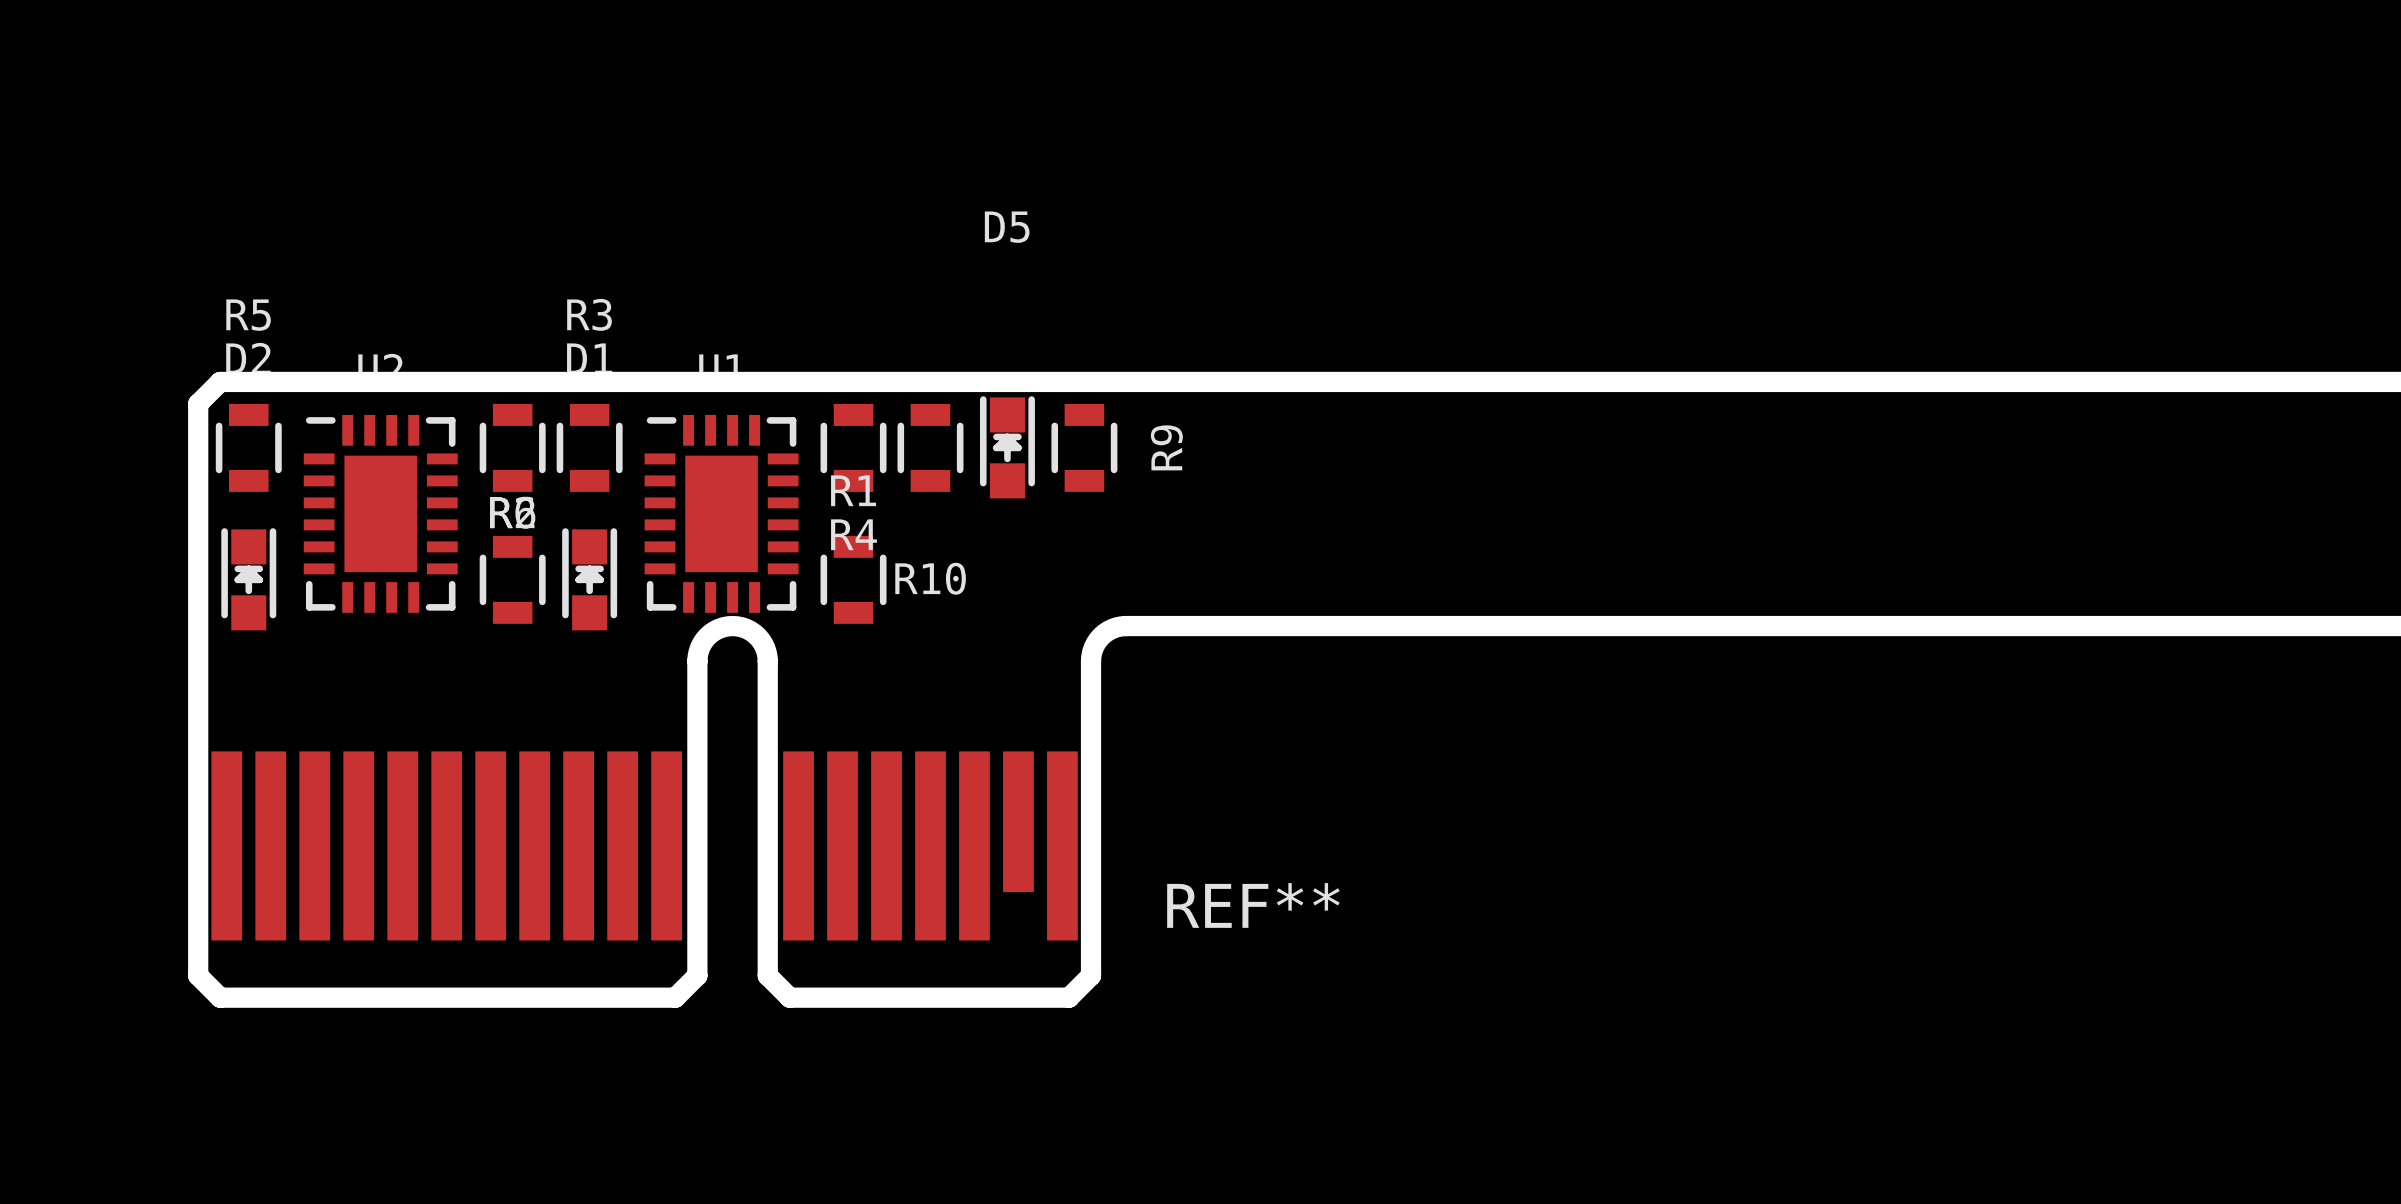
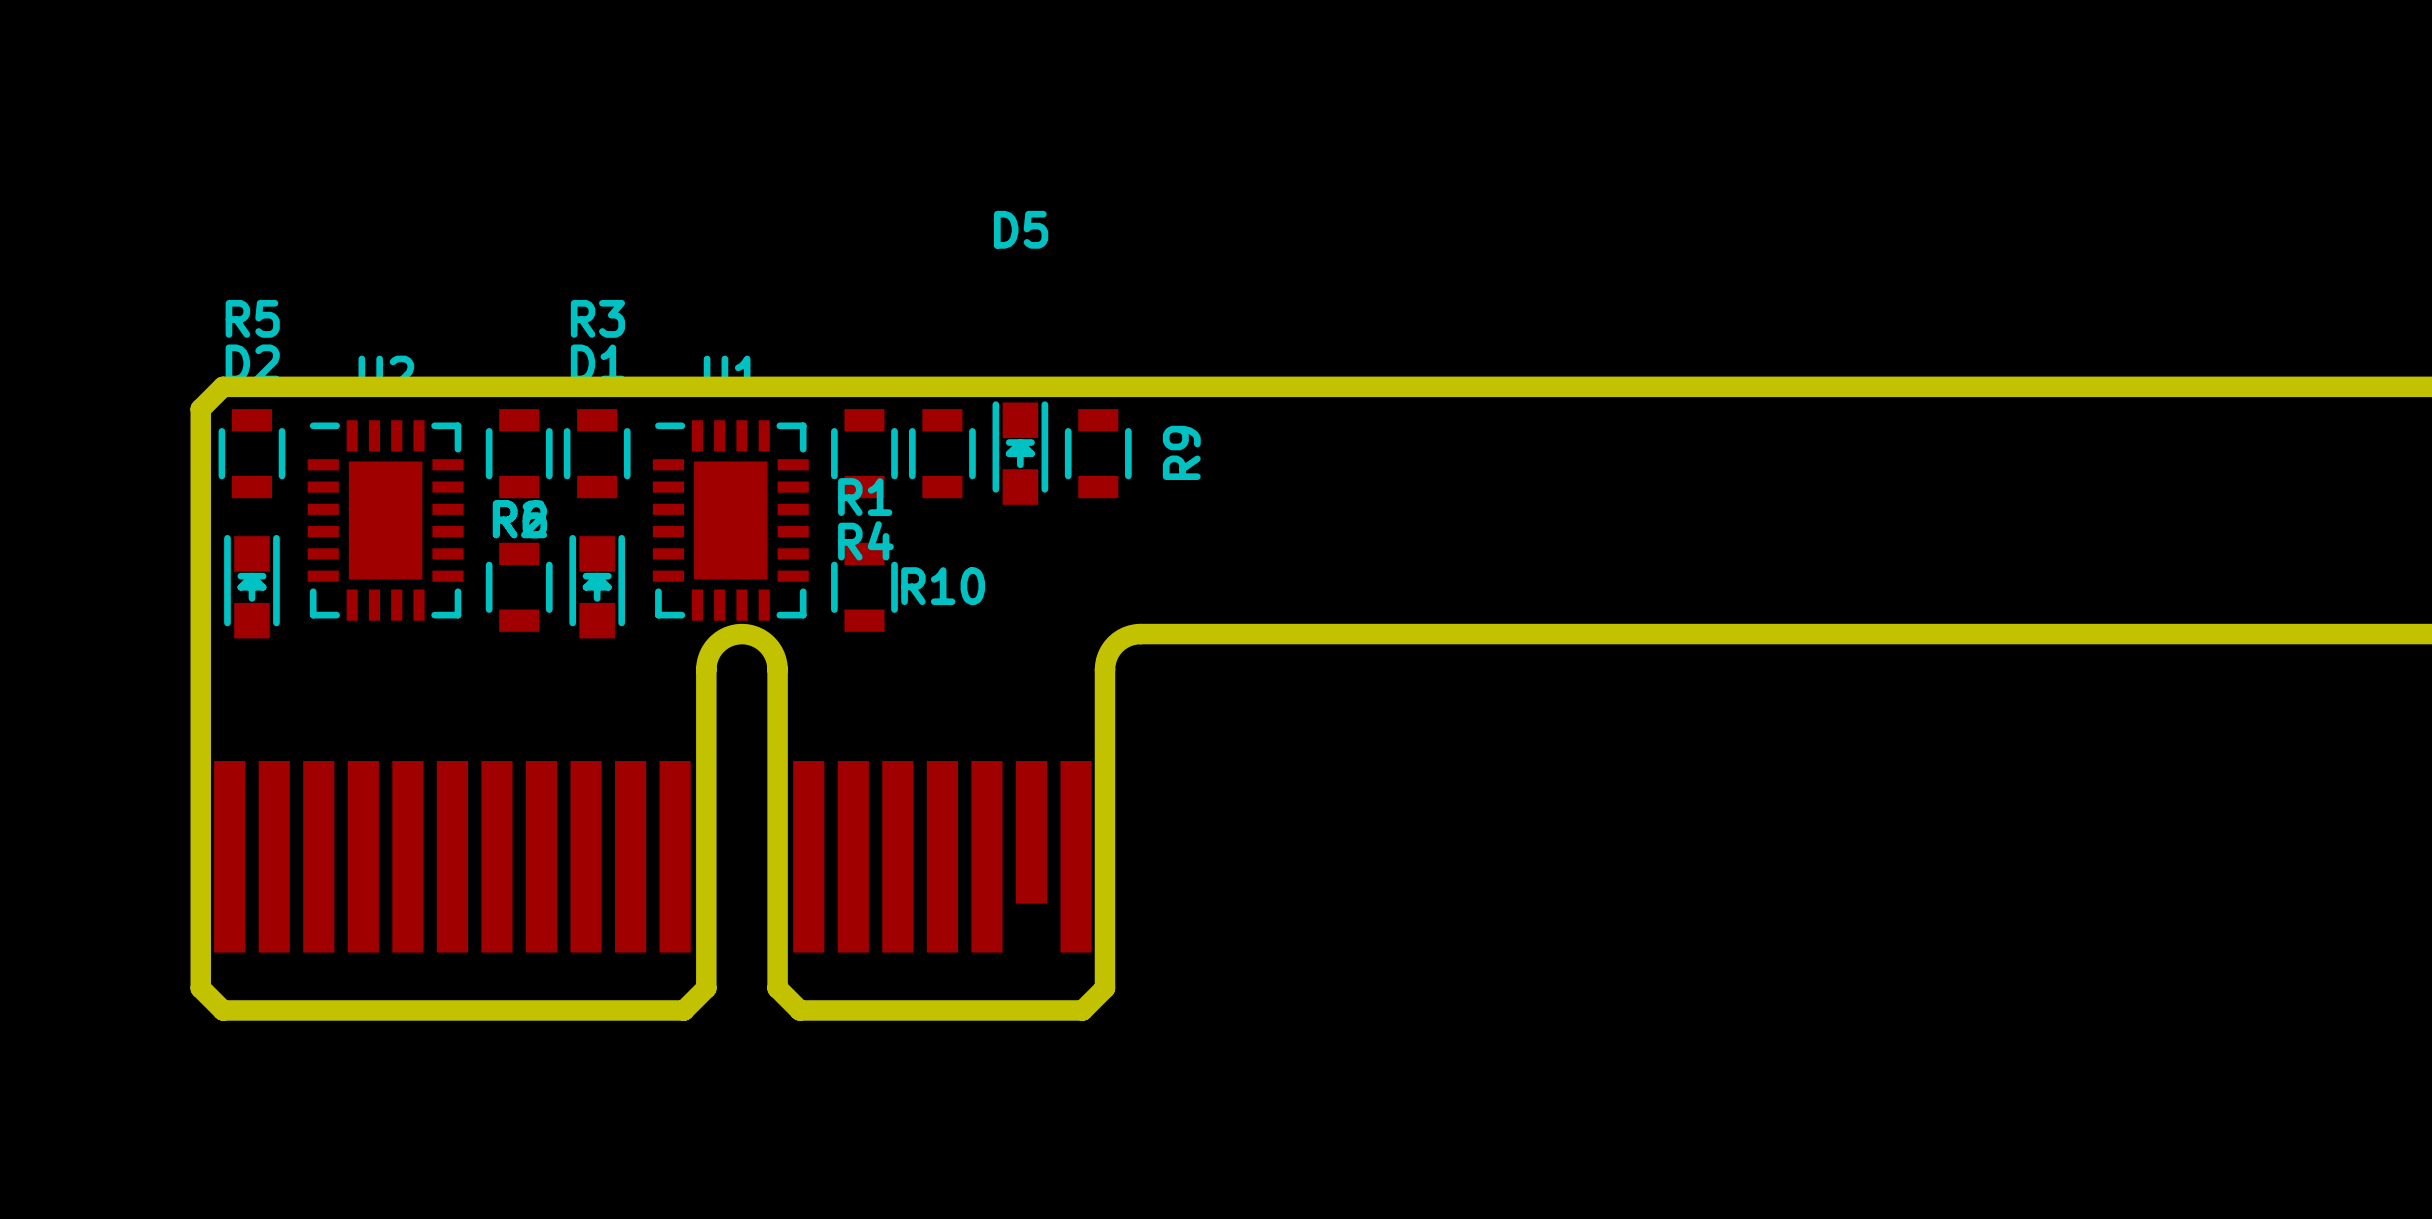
REF**: (1253, 905) -> none

